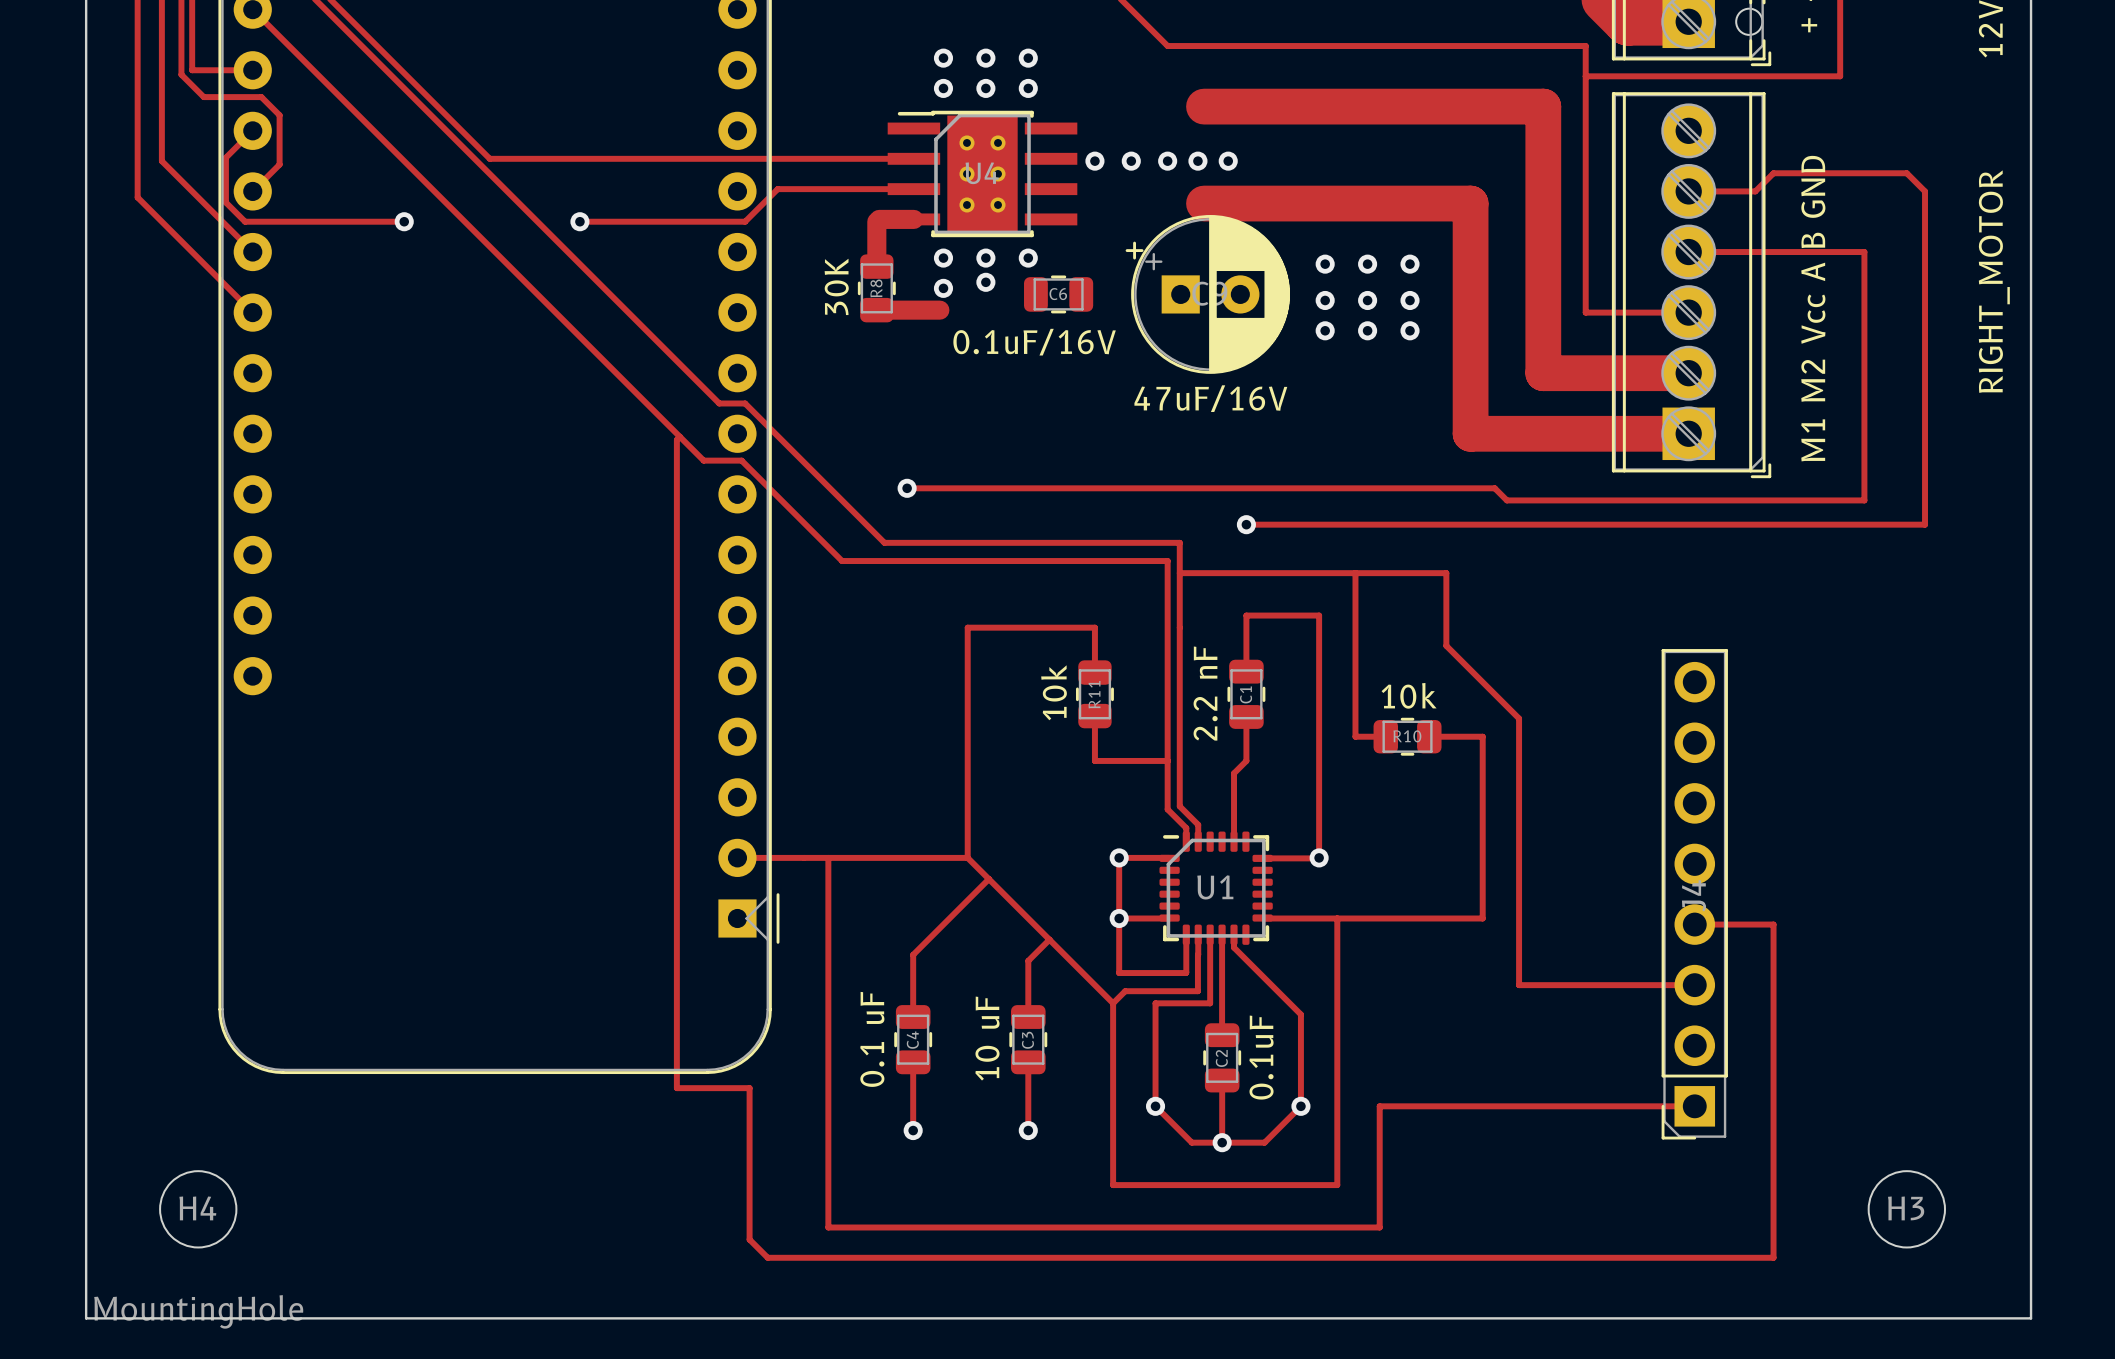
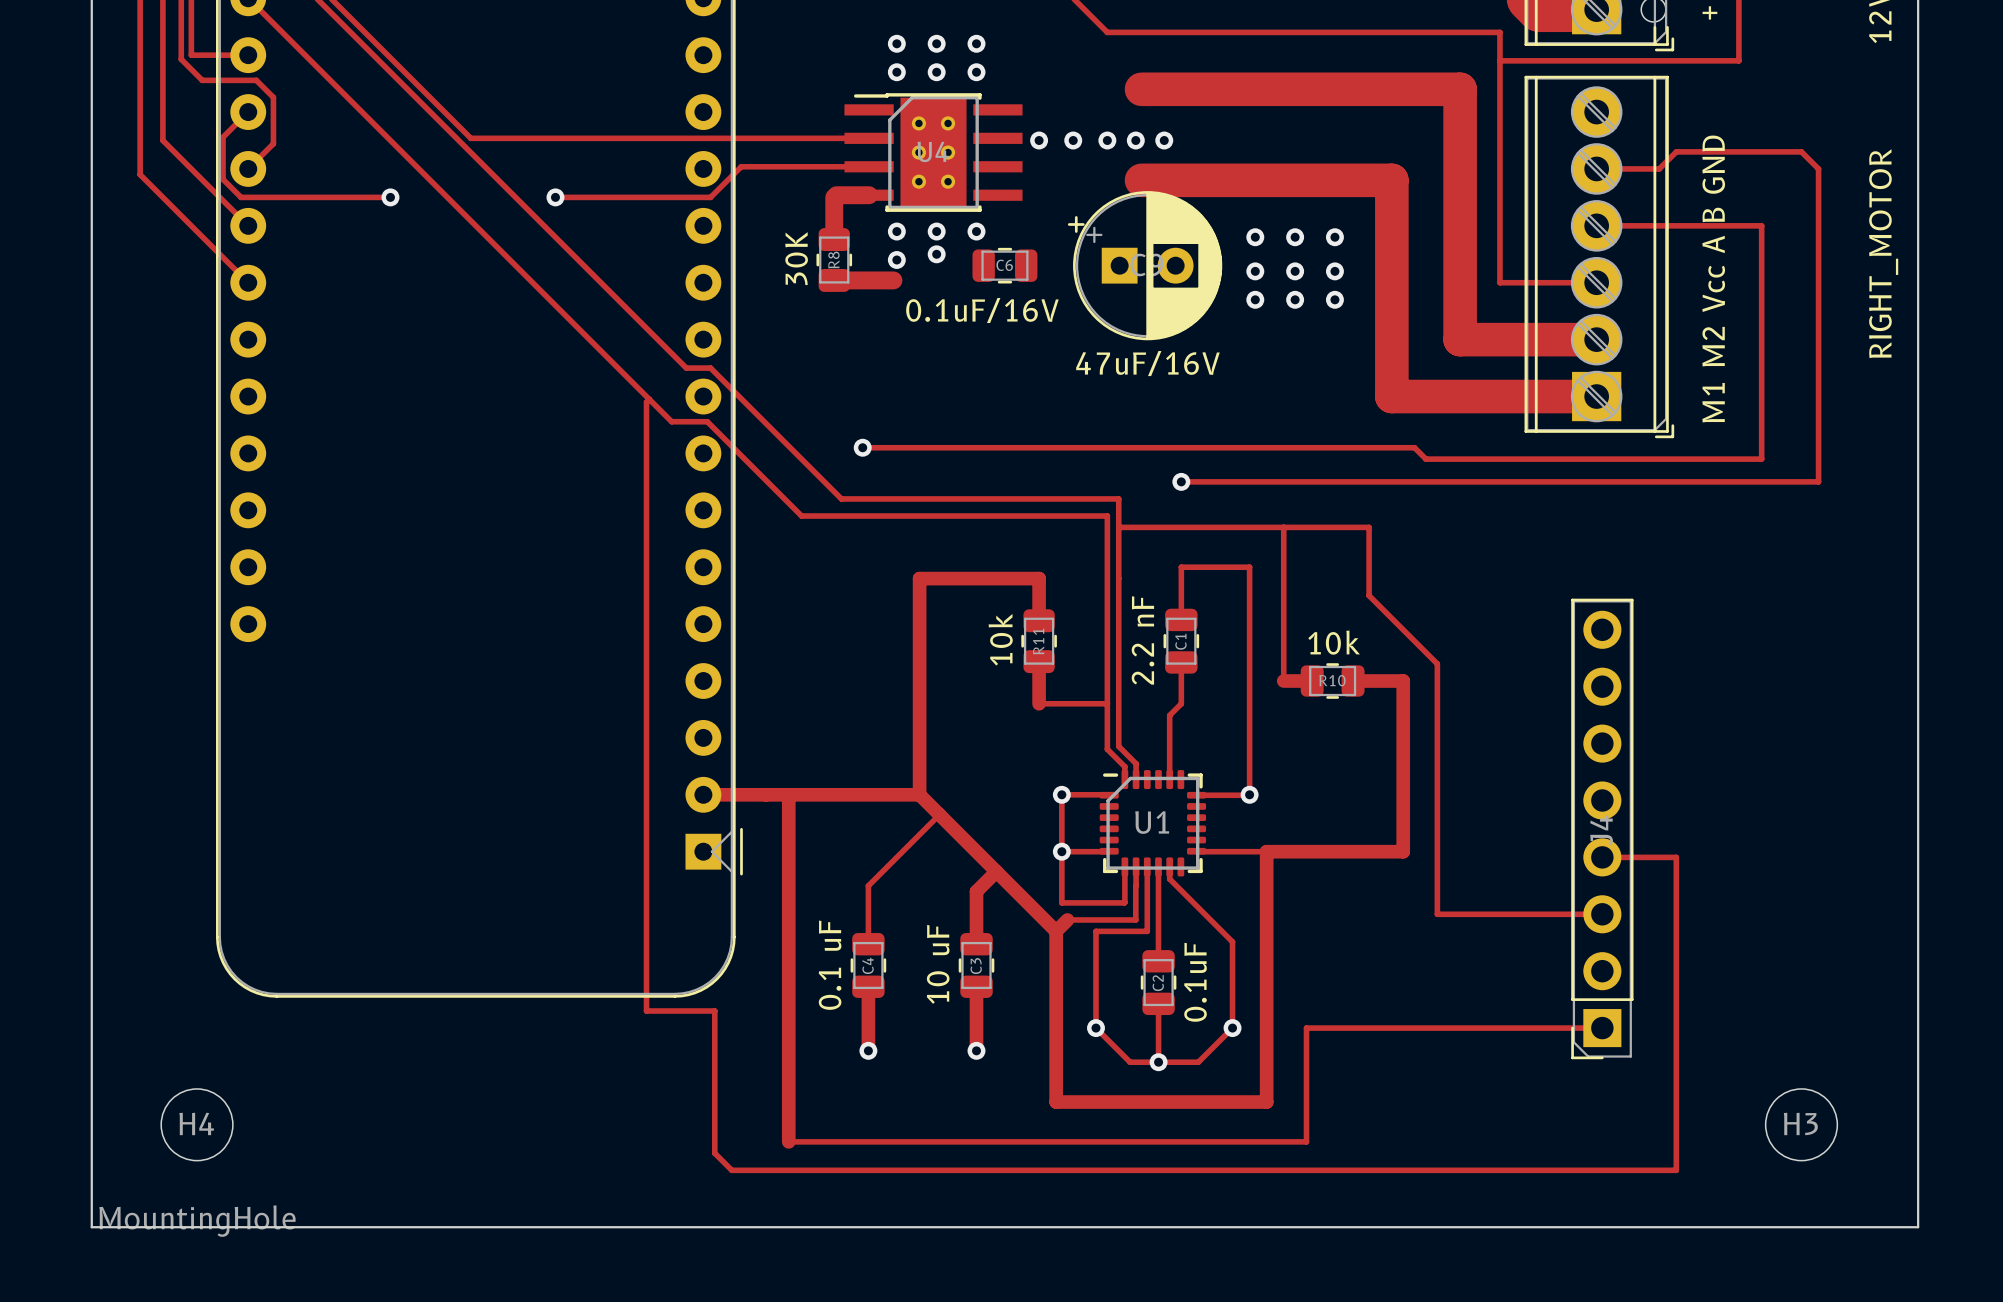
track width: thin (1094, 672) (1094, 627) (967, 627) (967, 857) -> thick (1039, 620) (1039, 578) (919, 578) (919, 794)
track width: thin (1094, 716) (1094, 760) -> thick (1039, 661) (1039, 703)
track width: thin (1355, 736) (1385, 736) -> thick (1283, 681) (1312, 681)
track width: thin (1429, 736) (1482, 736) (1482, 918) (1337, 918) (1337, 1185) (1113, 1185) (1113, 1003) -> thick (1353, 681) (1403, 681) (1403, 851) (1266, 851) (1266, 1102) (1056, 1102) (1056, 931)
track width: thin (737, 857) (967, 857) -> thick (703, 794) (919, 794)
track width: thin (828, 857) (828, 1227) -> thick (788, 794) (788, 1141)
track width: thin (967, 857) (1113, 1003) -> thick (919, 794) (1056, 931)
track width: thin (1049, 939) (1028, 960) (1028, 1017) -> thick (996, 871) (976, 891) (976, 944)
track width: thin (1125, 991) (1113, 1003) -> thick (1067, 919) (1056, 931)
track width: thin (913, 1062) (913, 1130) -> thick (868, 986) (868, 1050)
track width: thin (1028, 1062) (1028, 1130) -> thick (976, 986) (976, 1050)

